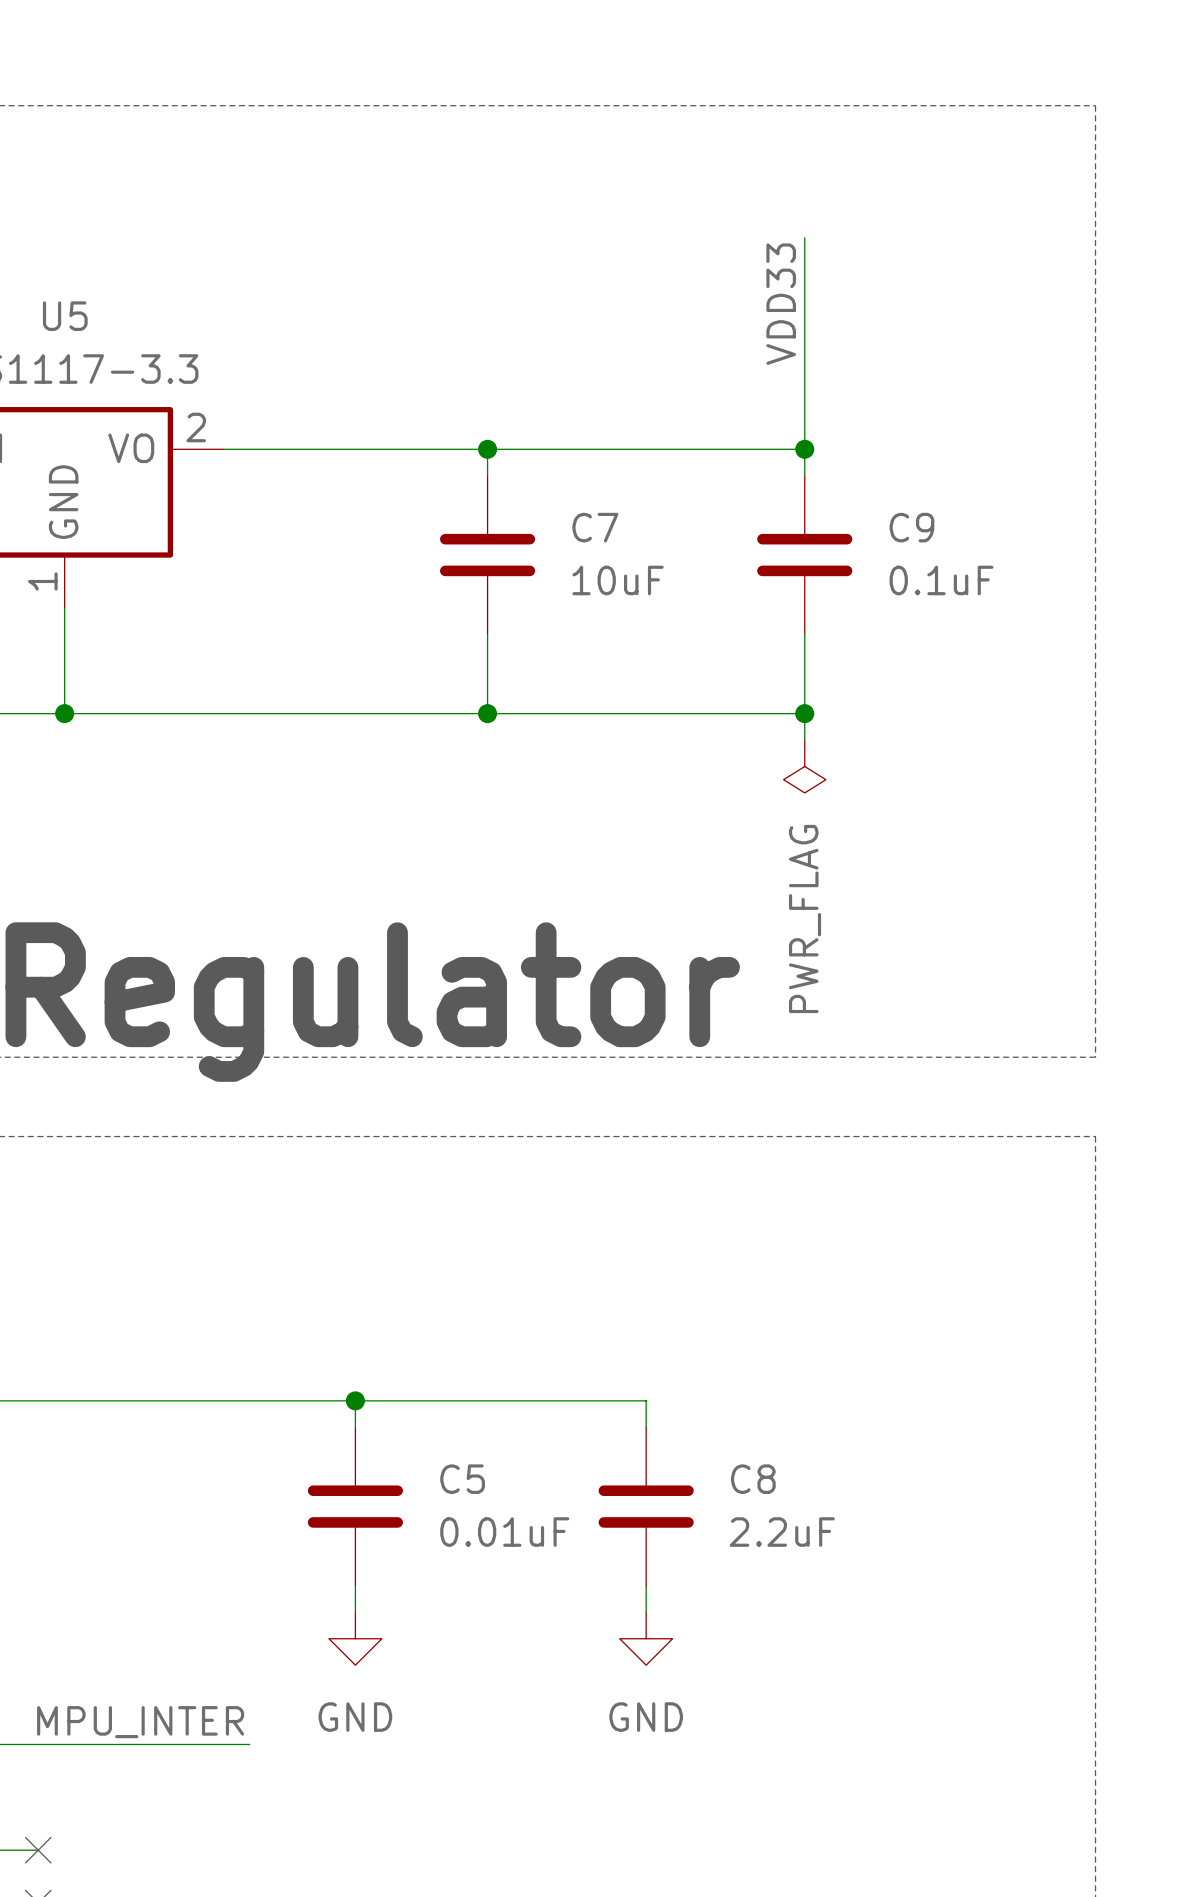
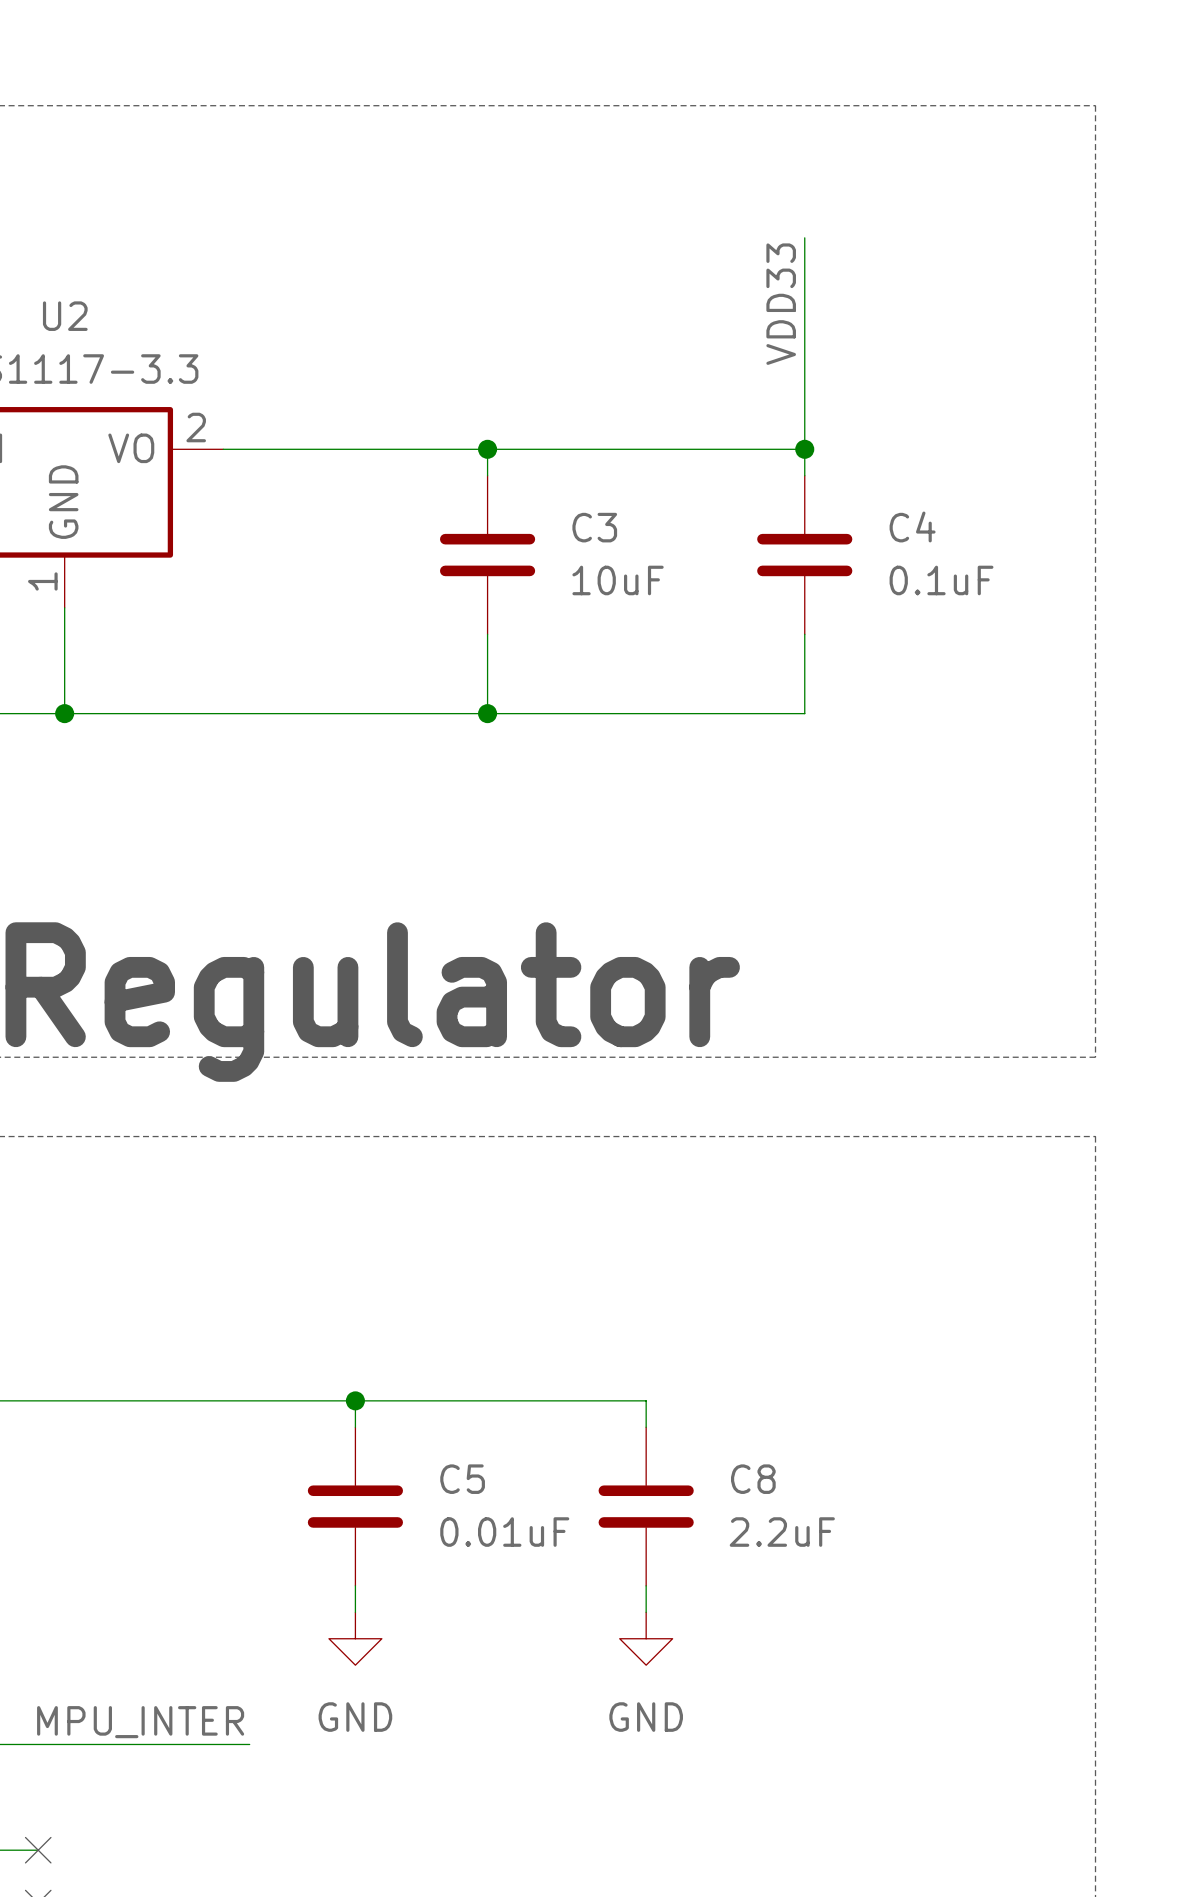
U5 name: U5 (65, 316) -> U2 (65, 316)
C7 name: C7 (595, 527) -> C3 (594, 527)
C9 name: C9 (911, 527) -> C4 (912, 526)
wire: (804, 713) (804, 740) -> none
junction: (804, 713) -> none
power symbol: PWR_FLAG (804, 766) -> none

